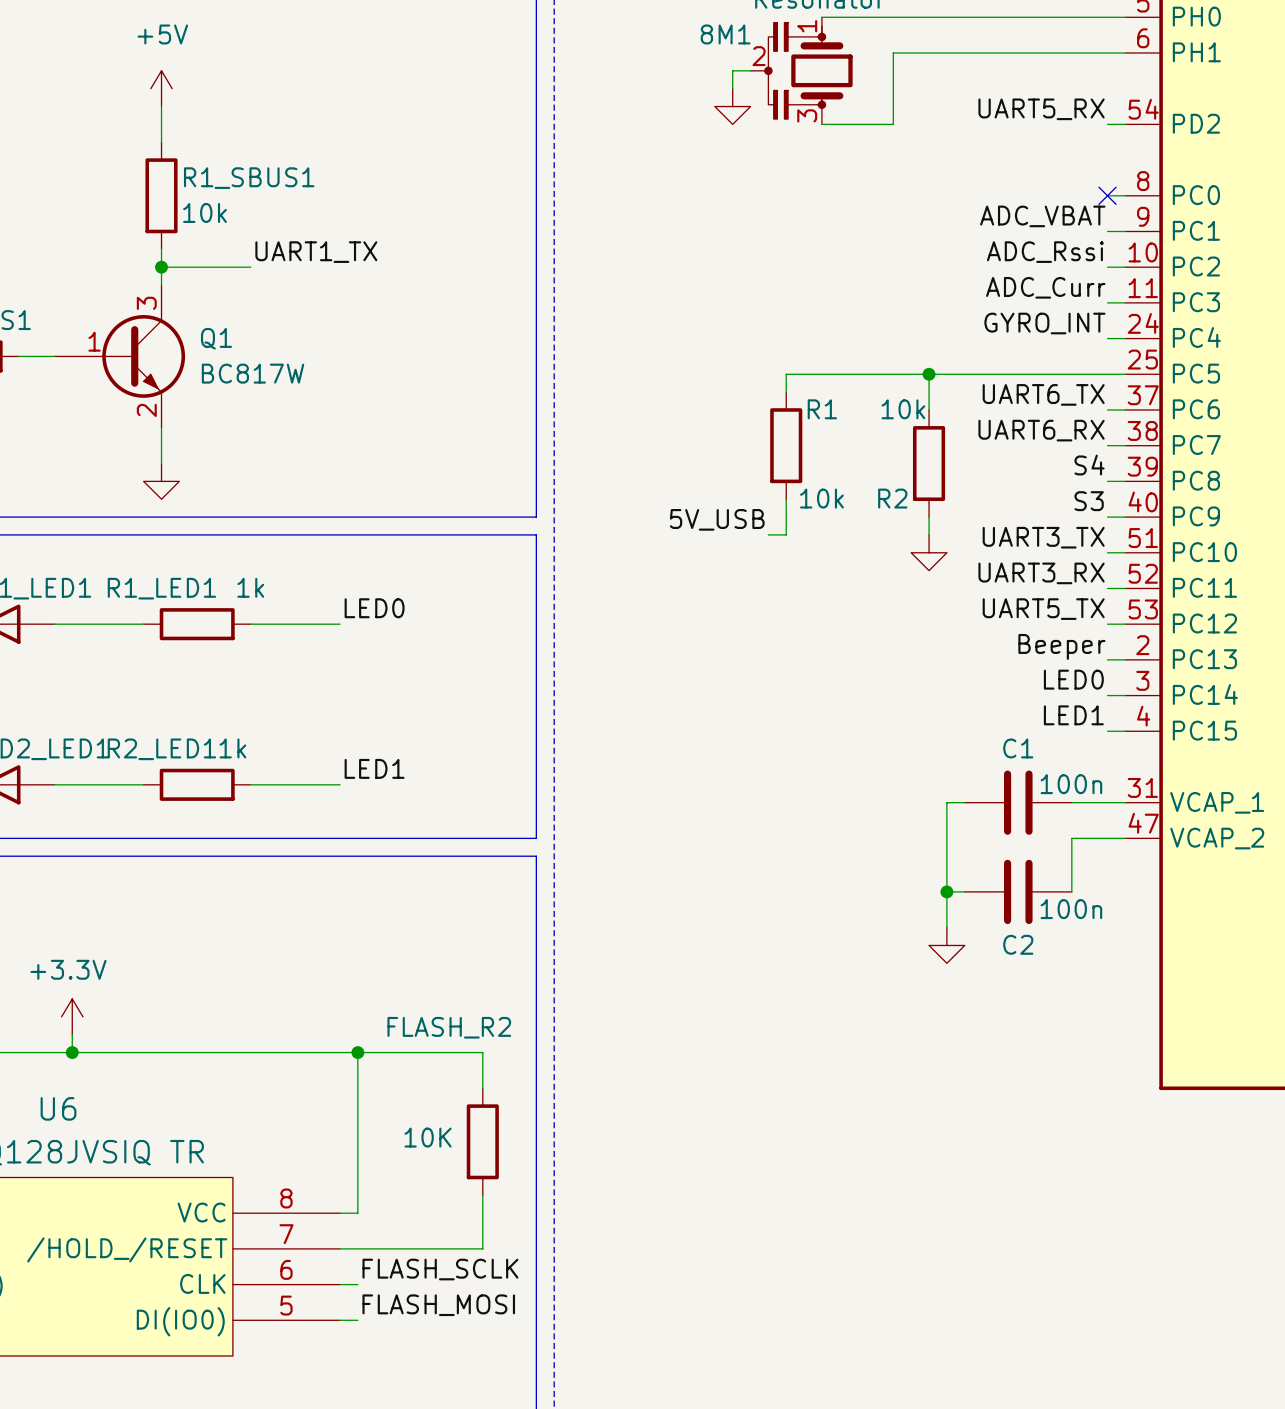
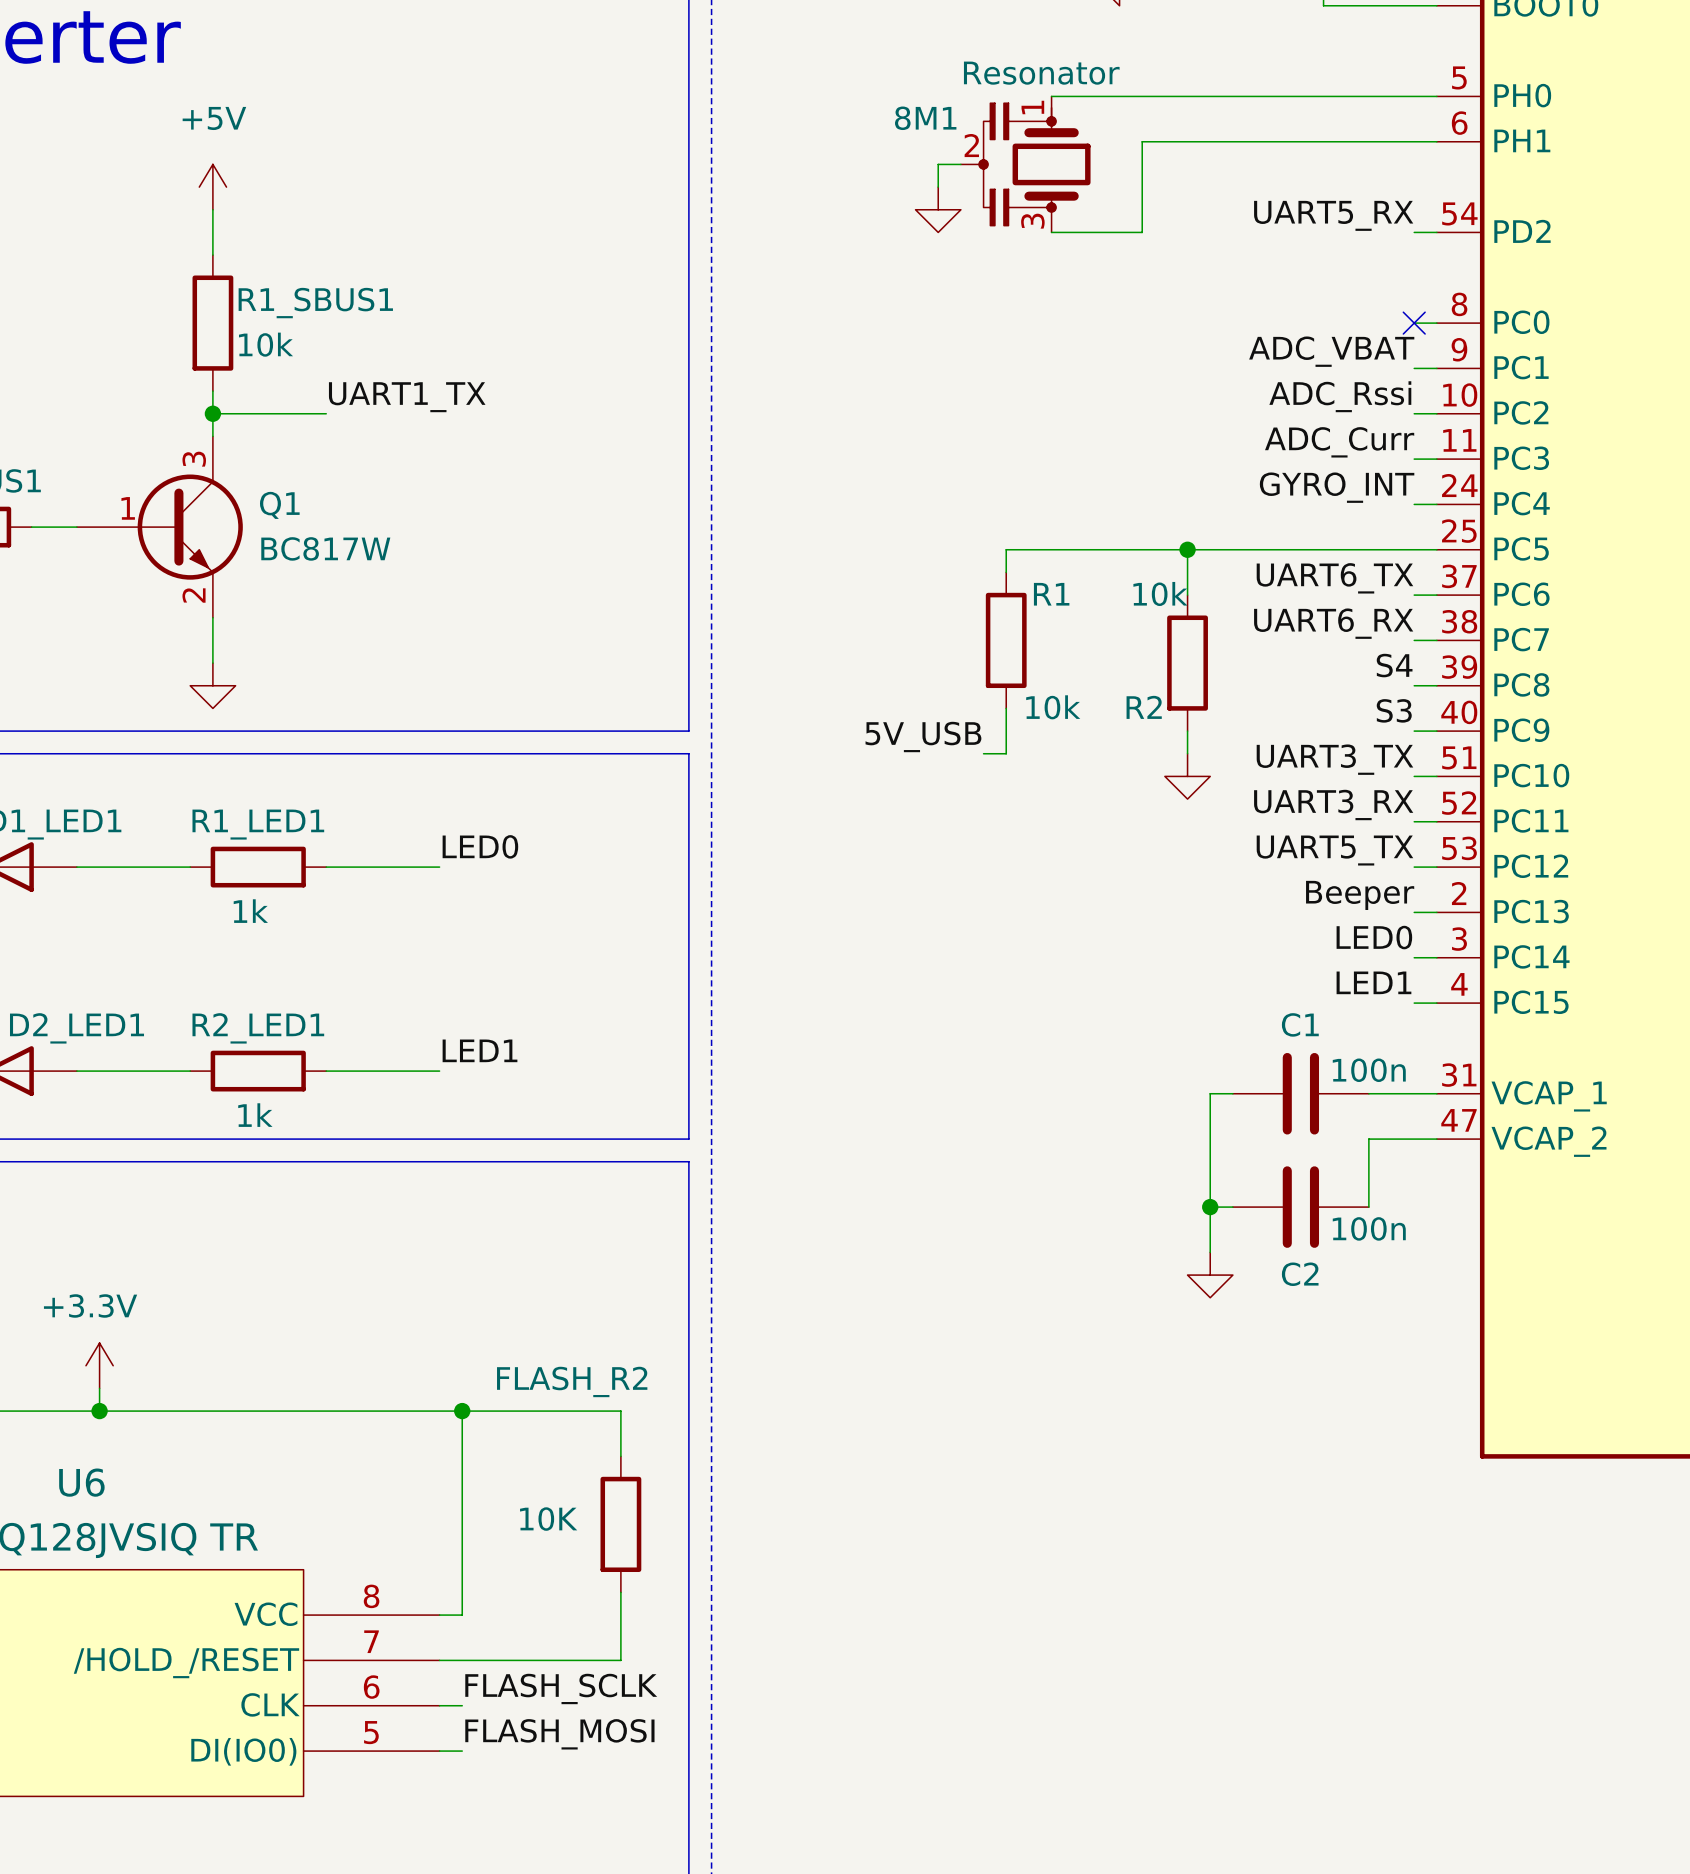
R1_LED1 value position: 1k (250, 587) -> 1k (250, 911)
R1_LED1 name position: R1_LED1 (161, 588) -> R1_LED1 (258, 824)
R2_LED1 value position: 1k (232, 748) -> 1k (255, 1115)
R2_LED1 name position: R2_LED1 (161, 749) -> R2_LED1 (258, 1028)

